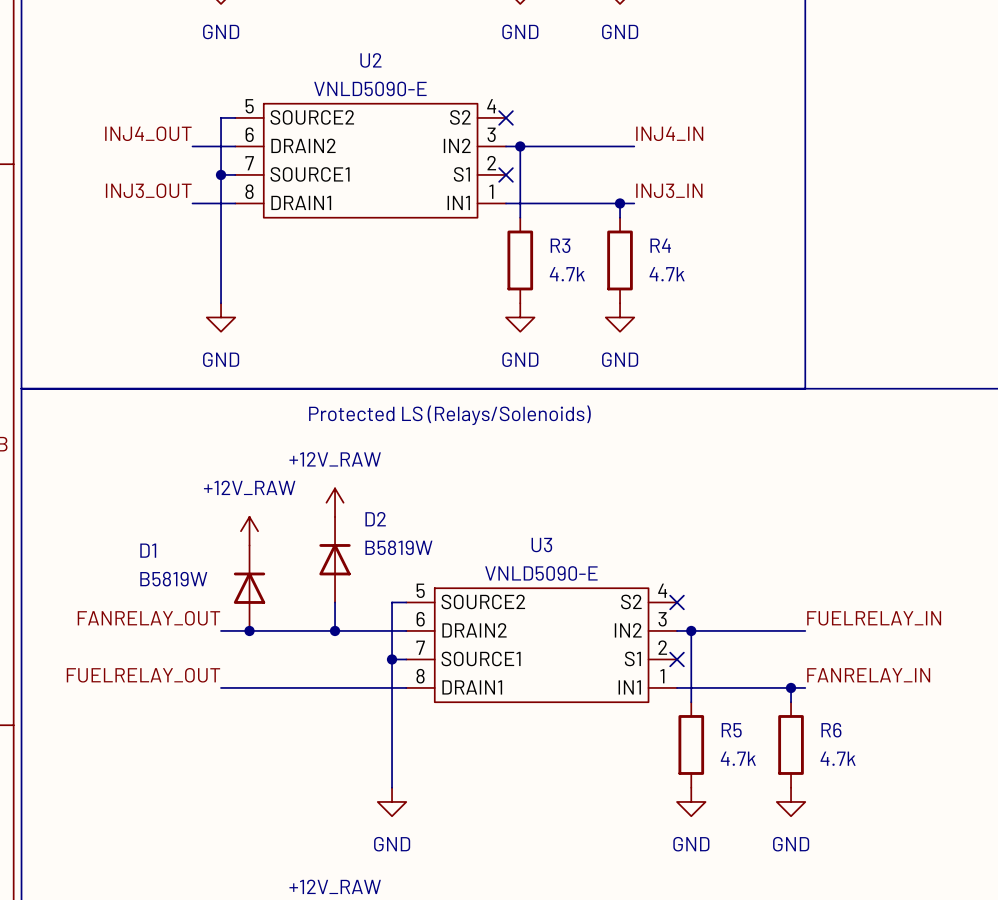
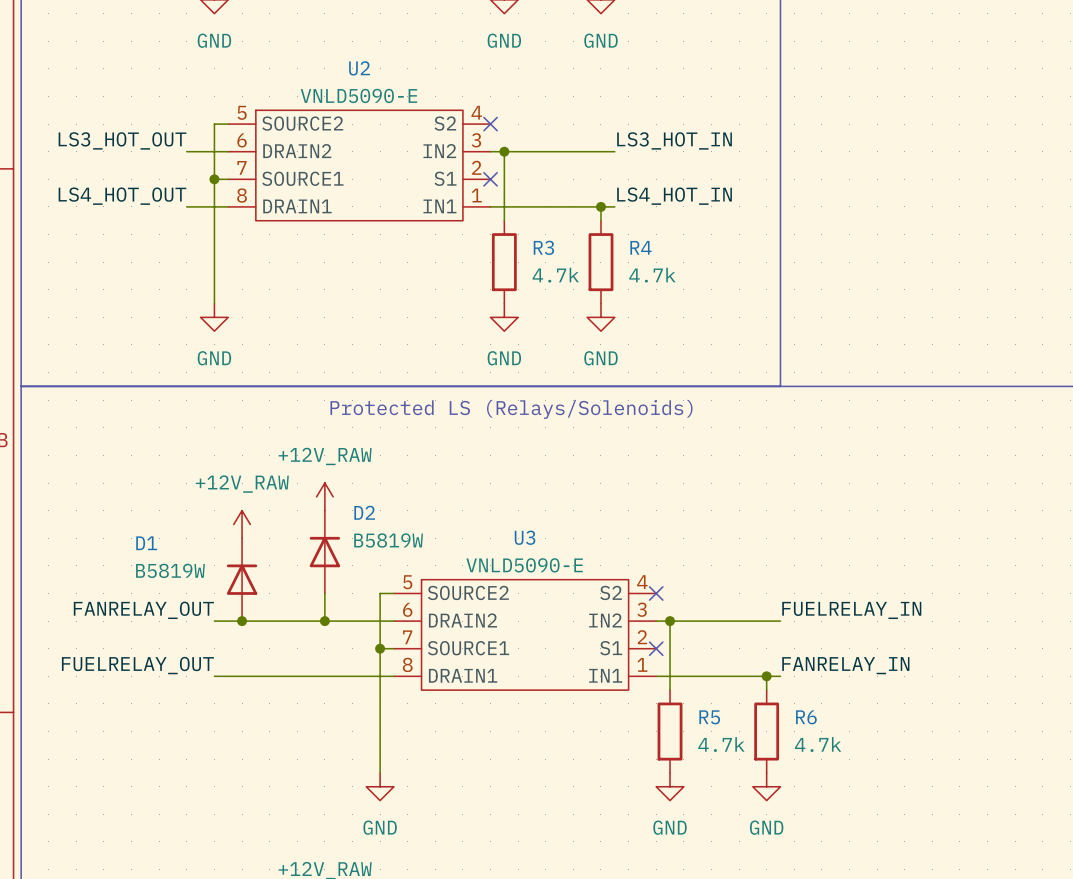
label: INJ4_OUT (148, 133) -> LS3_HOT_OUT (122, 140)
label: INJ4_IN (669, 133) -> LS3_HOT_IN (674, 140)
label: INJ3_OUT (148, 190) -> LS4_HOT_OUT (122, 196)
label: INJ3_IN (669, 190) -> LS4_HOT_IN (674, 196)
text position: Protected LS (Relays/Solenoids) (449, 415) -> Protected LS (Relays/Solenoids) (511, 409)

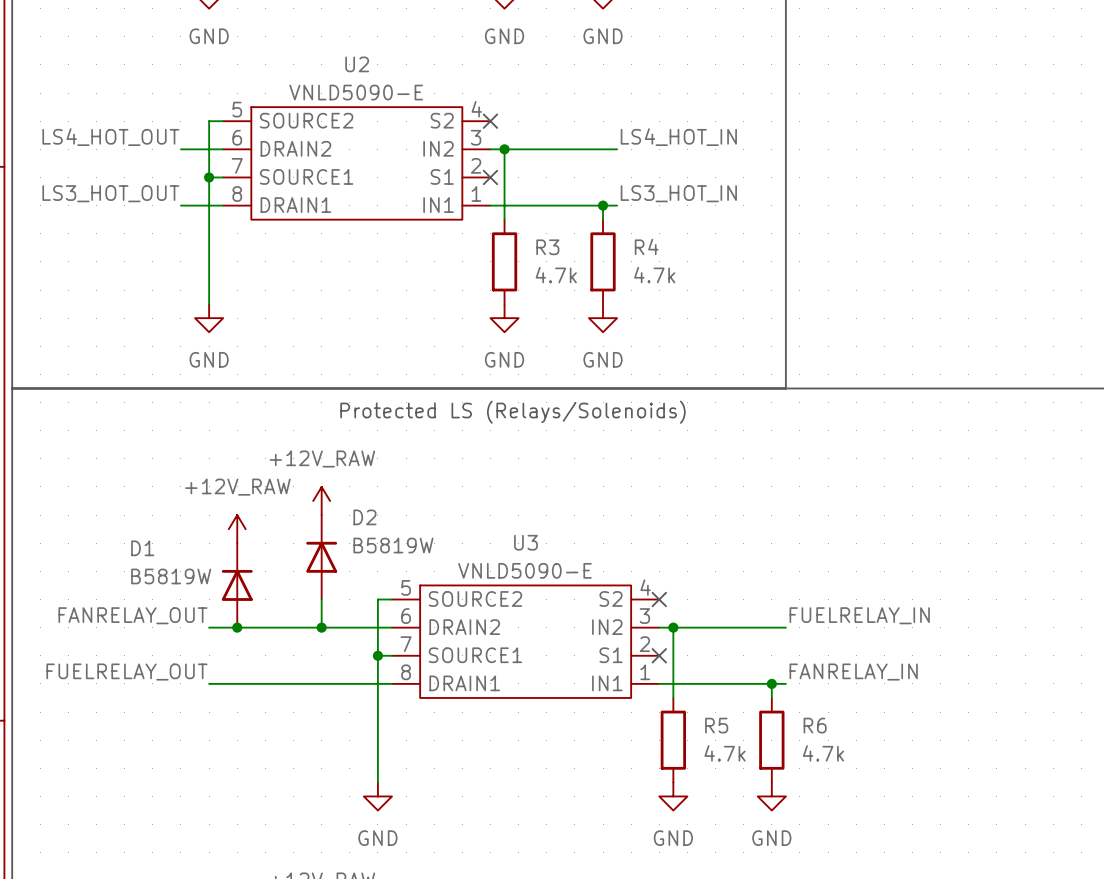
label: LS3_HOT_OUT (122, 140) -> LS4_HOT_OUT (110, 137)
label: LS3_HOT_IN (674, 140) -> LS4_HOT_IN (678, 137)
label: LS4_HOT_OUT (122, 196) -> LS3_HOT_OUT (110, 193)
label: LS4_HOT_IN (674, 196) -> LS3_HOT_IN (678, 193)

